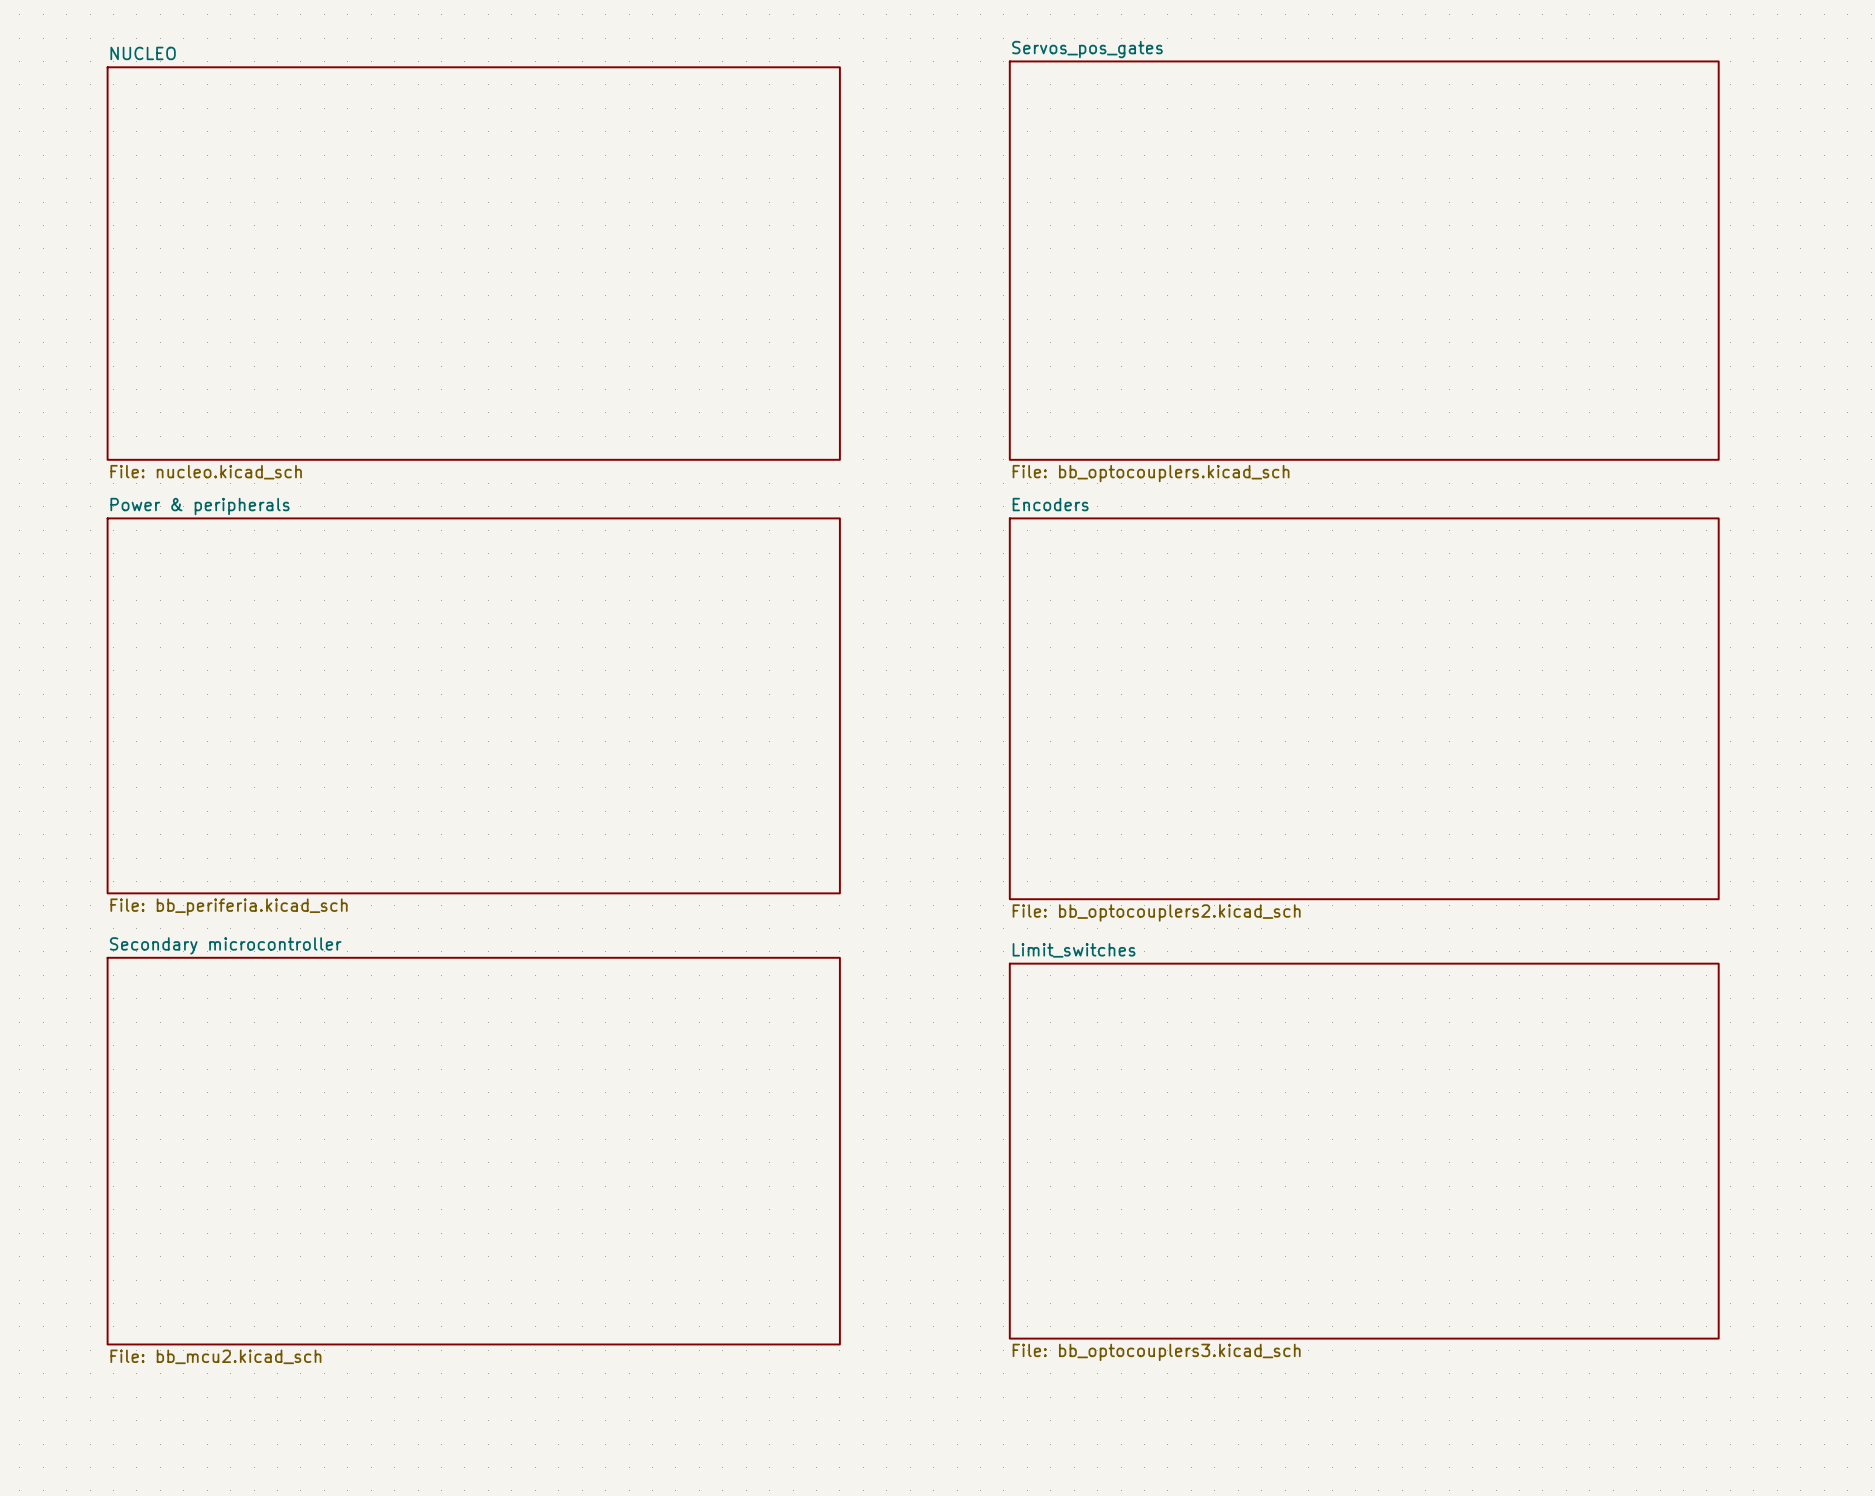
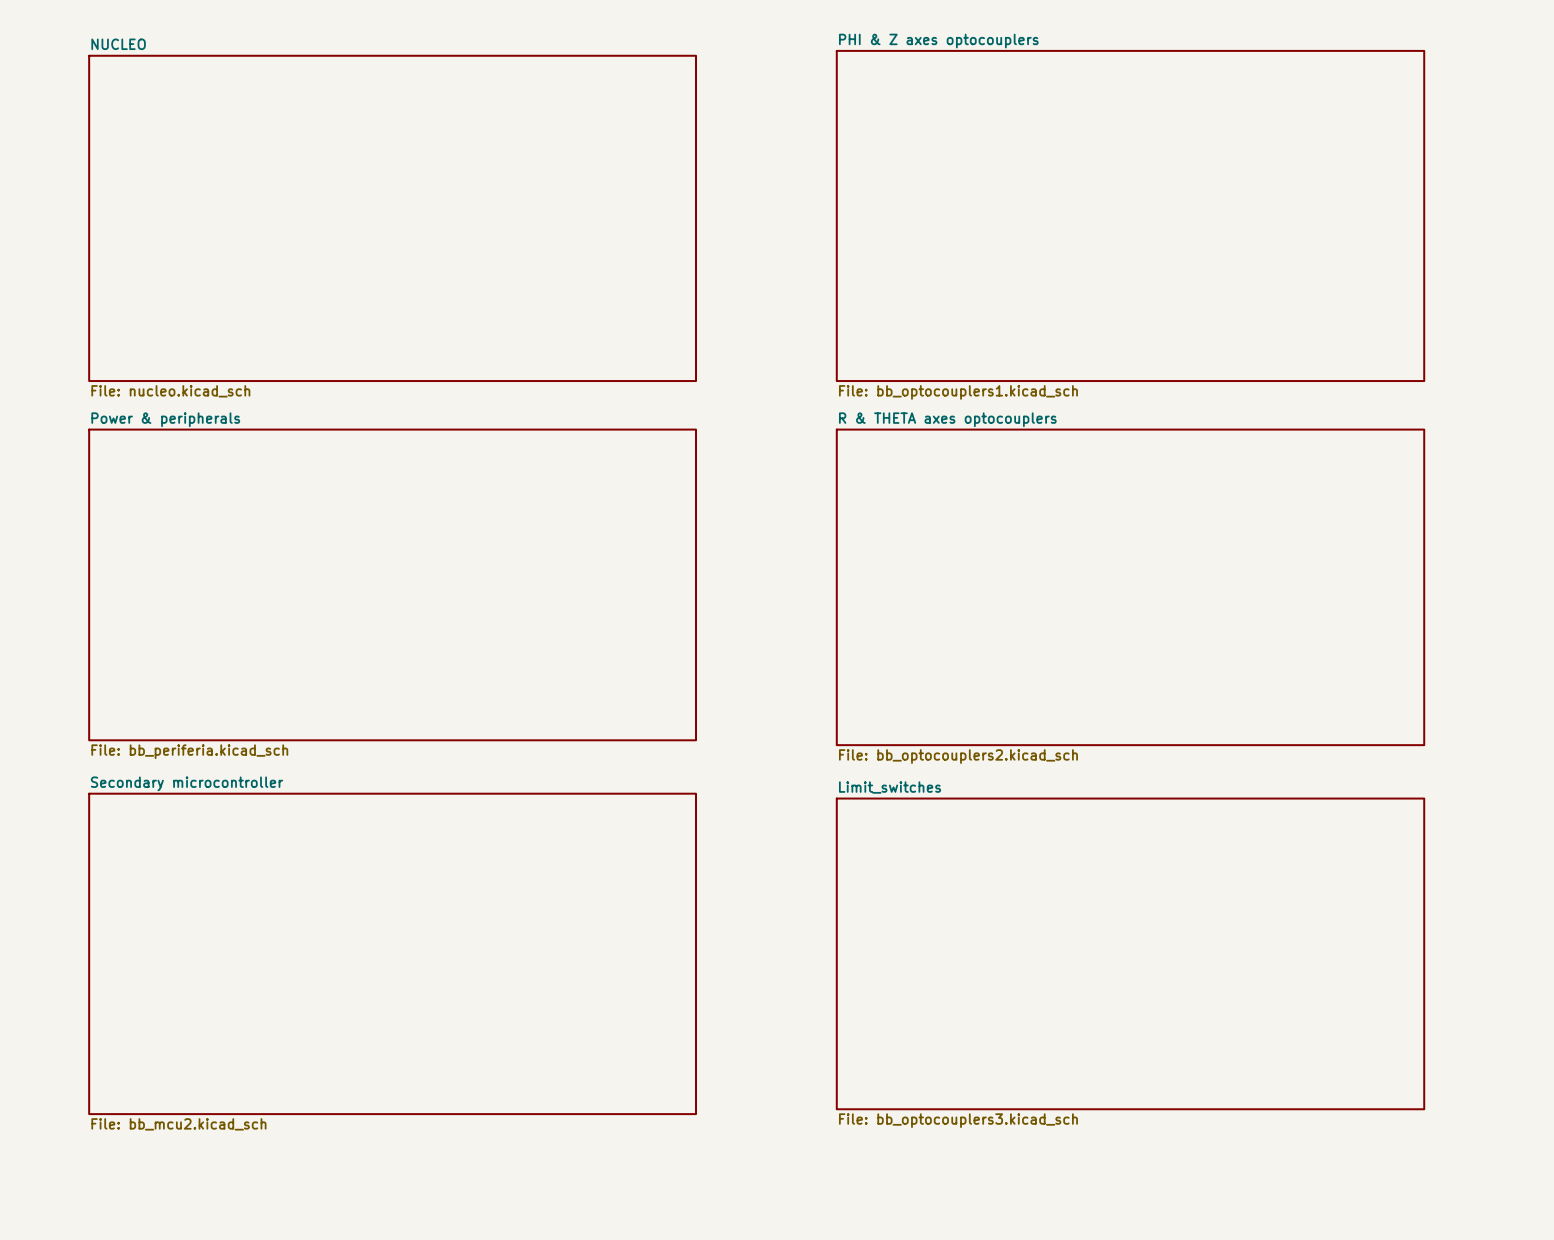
sheet Servos_pos_gates name: Servos_pos_gates (1087, 49) -> PHI & Z axes optocouplers (938, 41)
sheet Servos_pos_gates value: File: bb_optocouplers.kicad_sch (1151, 473) -> File: bb_optocouplers1.kicad_sch (958, 392)
sheet Encoders name: Encoders (1050, 504) -> R & THETA axes optocouplers (947, 419)

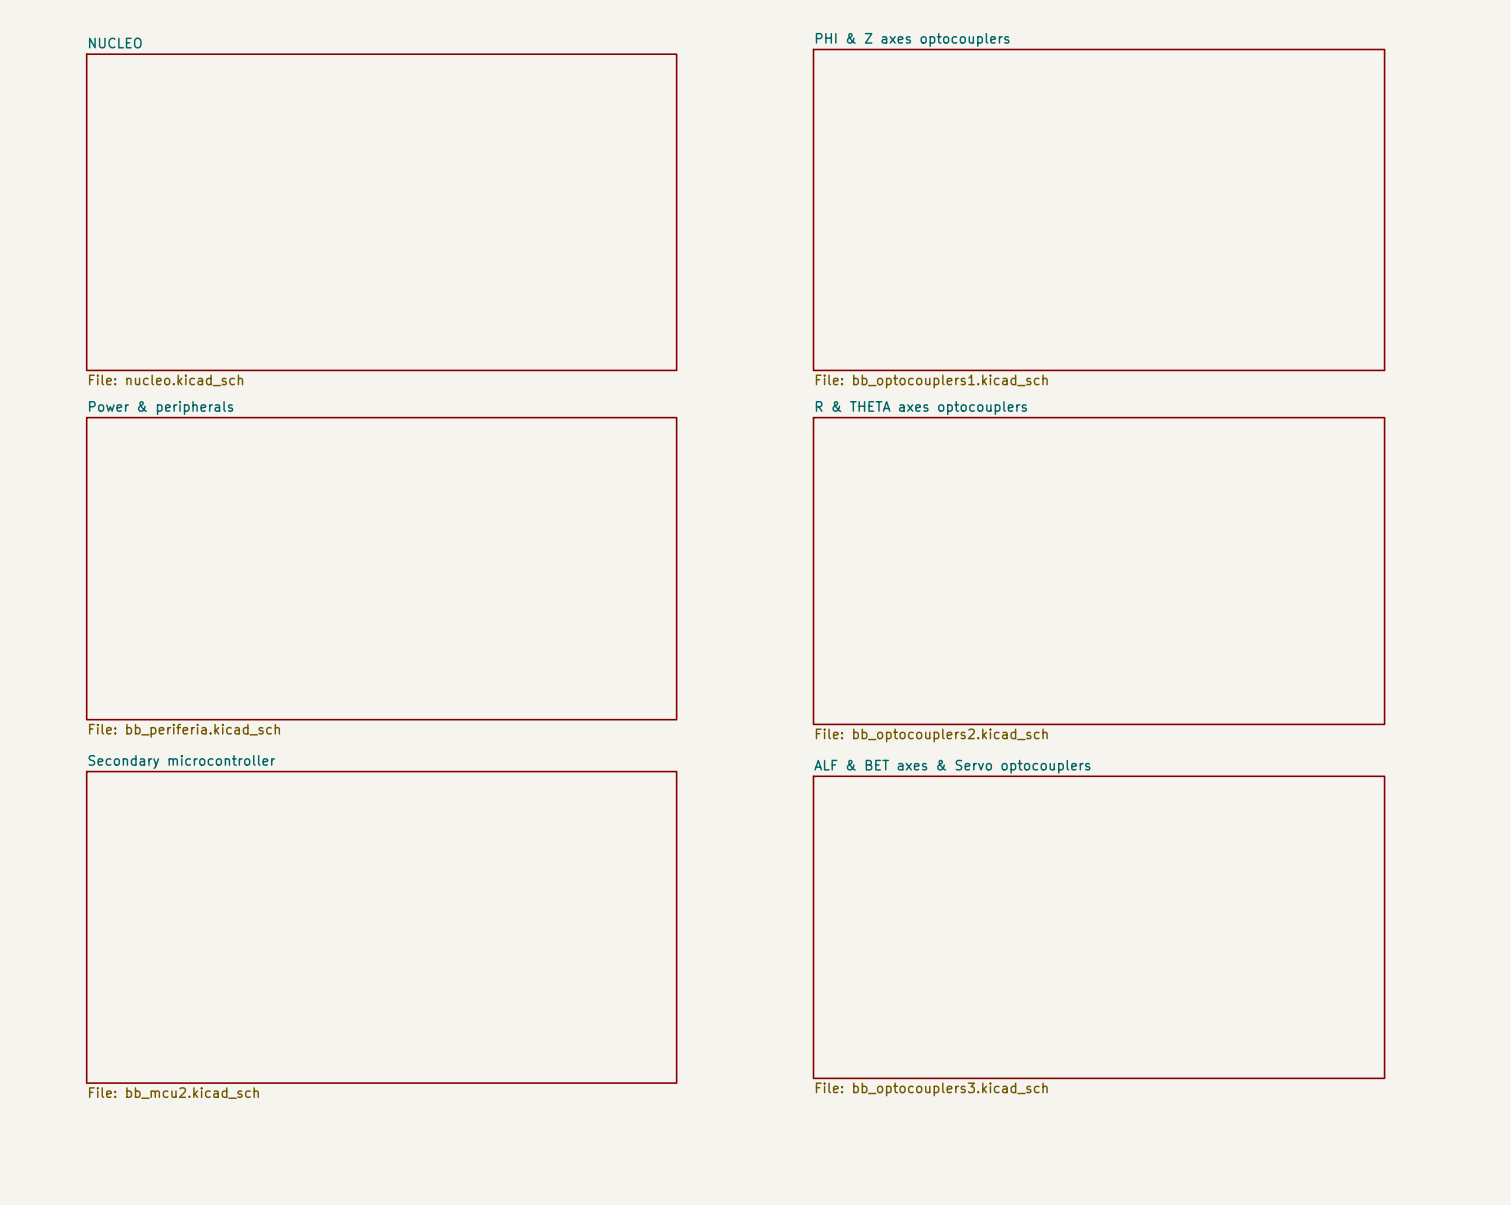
sheet Limit_switches name: Limit_switches (890, 787) -> ALF & BET axes & Servo optocouplers (952, 766)

